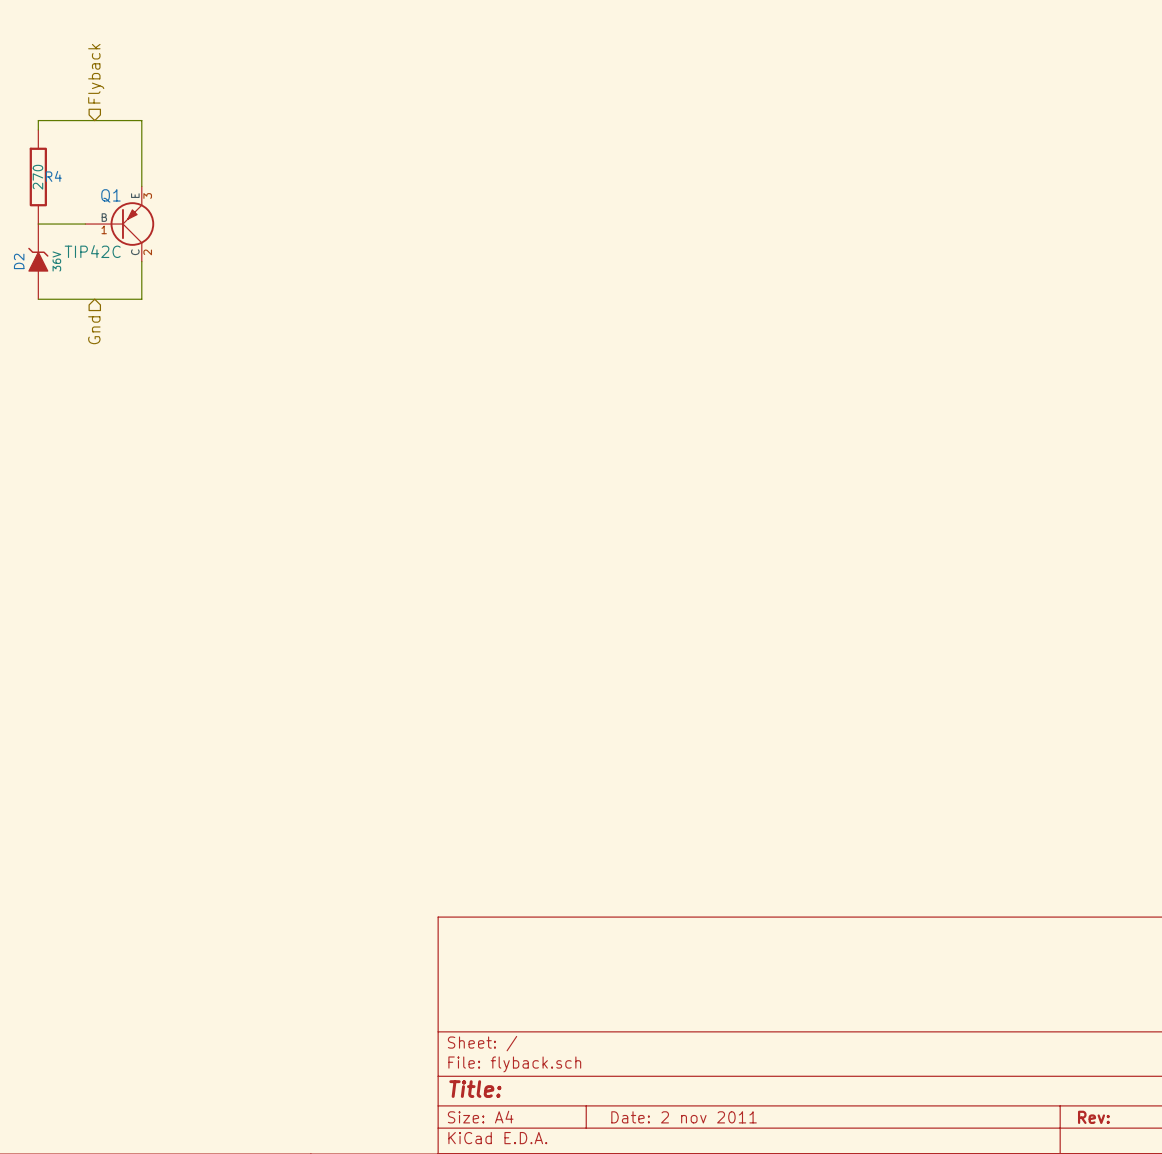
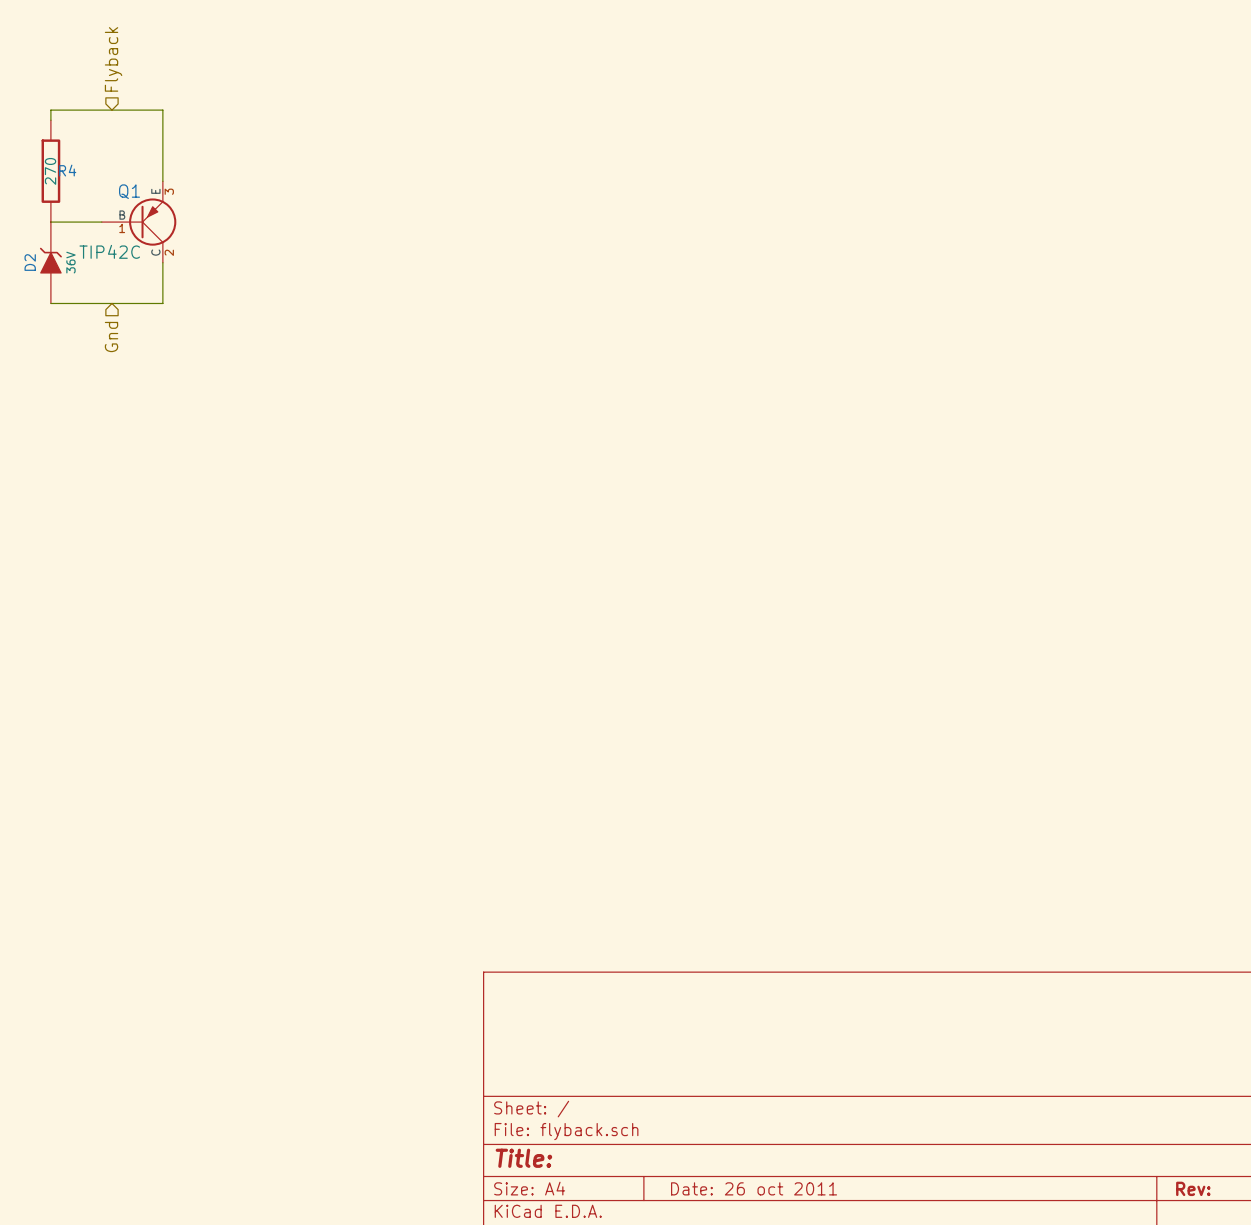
title block: Date: 2 nov 2011 (684, 1117) -> Date: 26 oct 2011 (754, 1188)

